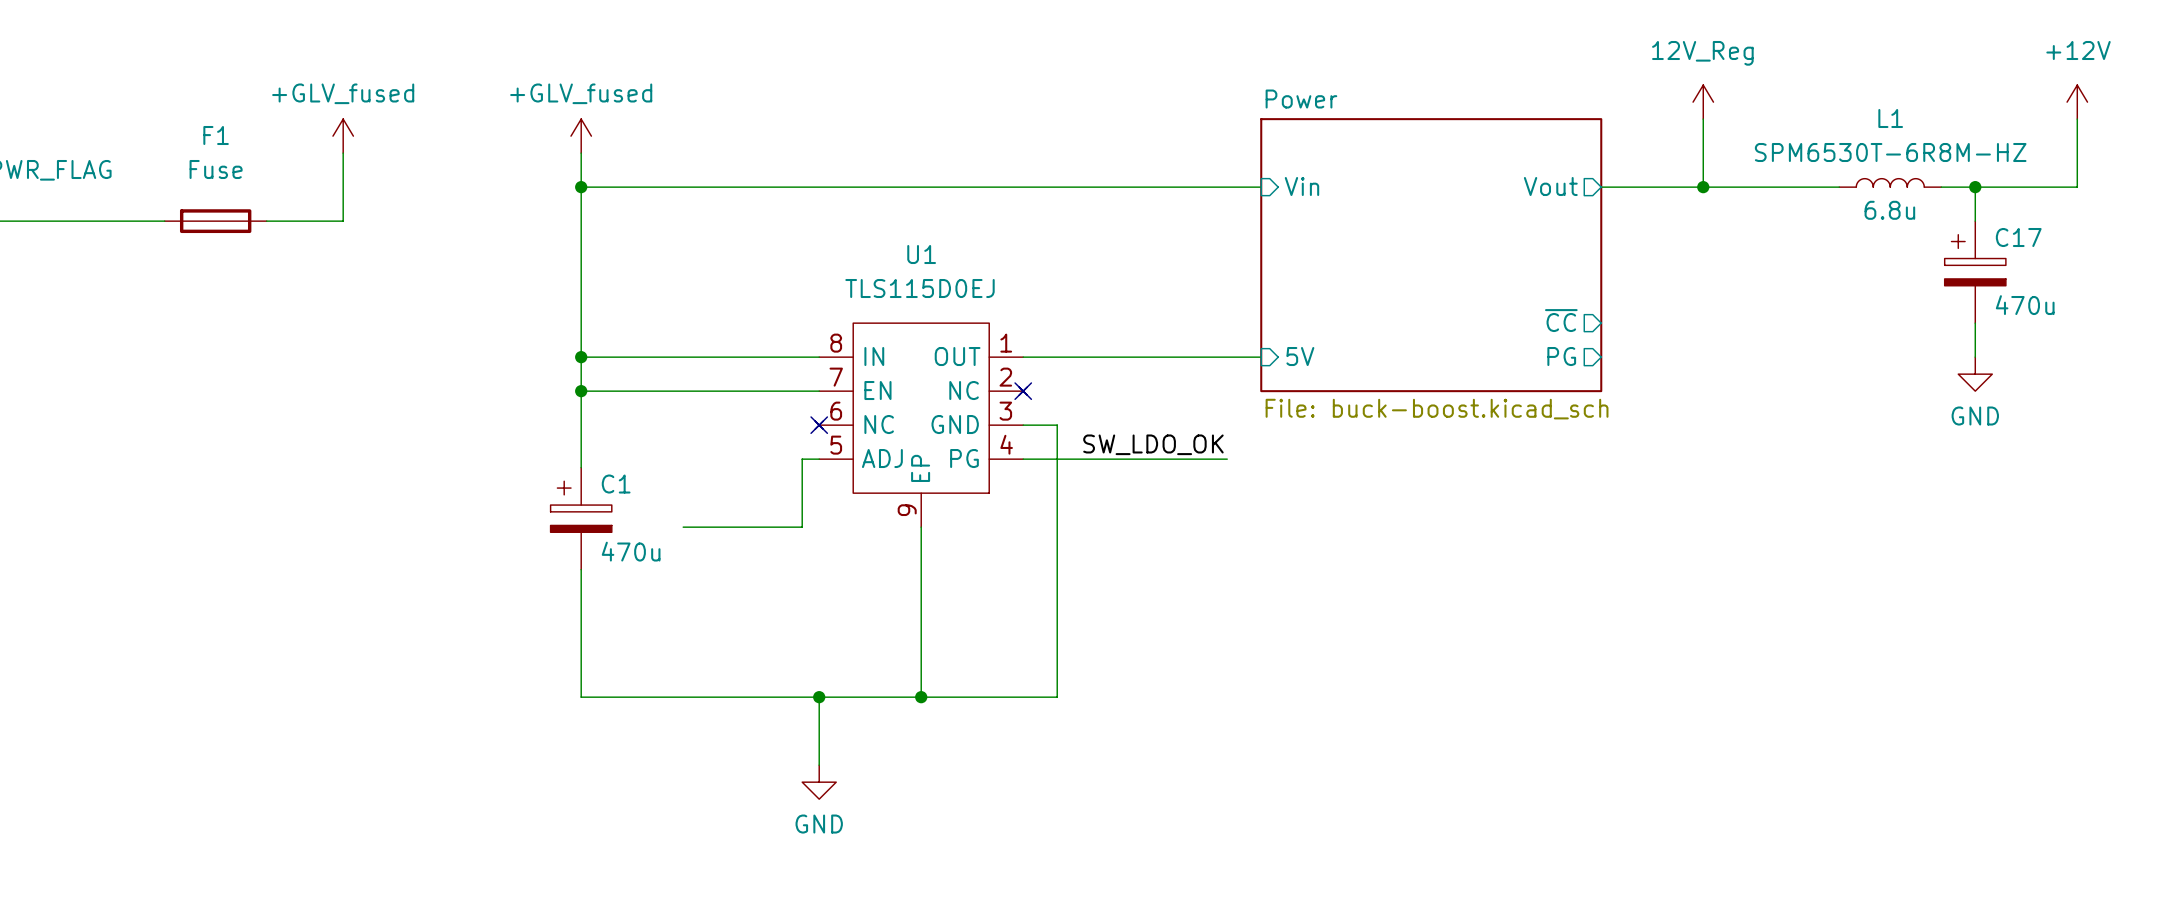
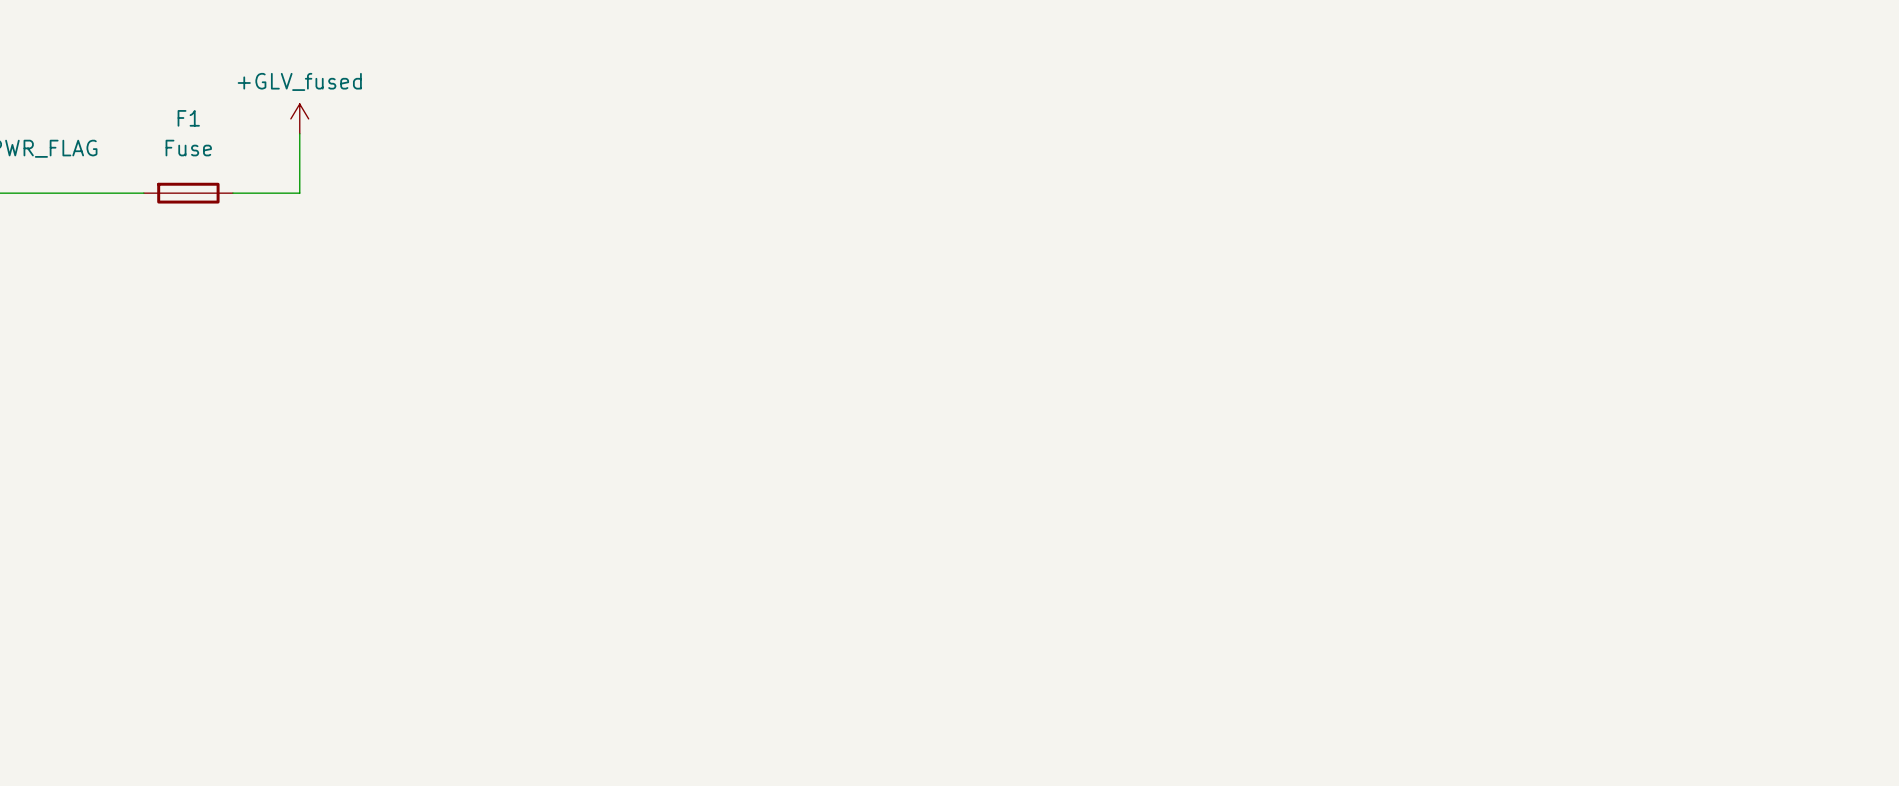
power symbol: 12V_Reg (1703, 102) -> none
power symbol: +12V (2077, 102) -> none
wire: (1703, 119) (1703, 187) -> none
wire: (2077, 119) (2077, 187) (1941, 187) -> none
power symbol: +GLV_fused (581, 136) -> none
wire: (581, 153) (581, 467) -> none
L1: 6.8u (1890, 182) -> none
sheet pin: Vin (1301, 186) -> none
sheet pin: Vout (1550, 186) -> none
wire: (581, 187) (1261, 187) -> none
junction: (581, 187) -> none
wire: (1601, 187) (1839, 187) -> none
junction: (1703, 187) -> none
wire: (1975, 187) (1975, 221) -> none
junction: (1975, 187) -> none
sheet Power: File: buck-boost.kicad_sch (1431, 255) -> none
C17: 470u (1975, 272) -> none
sheet pin: ~{CC} (1561, 320) -> none
wire: (1975, 323) (1975, 357) -> none
sheet pin: 5V (1300, 356) -> none
sheet pin: PG (1561, 356) -> none
wire: (581, 357) (819, 357) -> none
junction: (581, 357) -> none
wire: (1023, 357) (1261, 357) -> none
power symbol: GND (1975, 374) -> none
wire: (581, 391) (819, 391) -> none
junction: (581, 391) -> none
no-connect mark: (1023, 391) -> none
no-connect mark: (819, 425) -> none
U1: TLS115D0EJ (921, 425) -> none
wire: (1023, 425) (1057, 425) (1057, 697) (581, 697) (581, 569) -> none
label: SW_LDO_OK (1153, 444) -> none
wire: (819, 459) (802, 459) (802, 527) (683, 527) -> none
wire: (1023, 459) (1227, 459) -> none
C1: 470u (581, 518) -> none
wire: (921, 527) (921, 697) -> none
wire: (819, 697) (819, 765) -> none
junction: (819, 697) -> none
junction: (921, 697) -> none
power symbol: GND (819, 782) -> none

